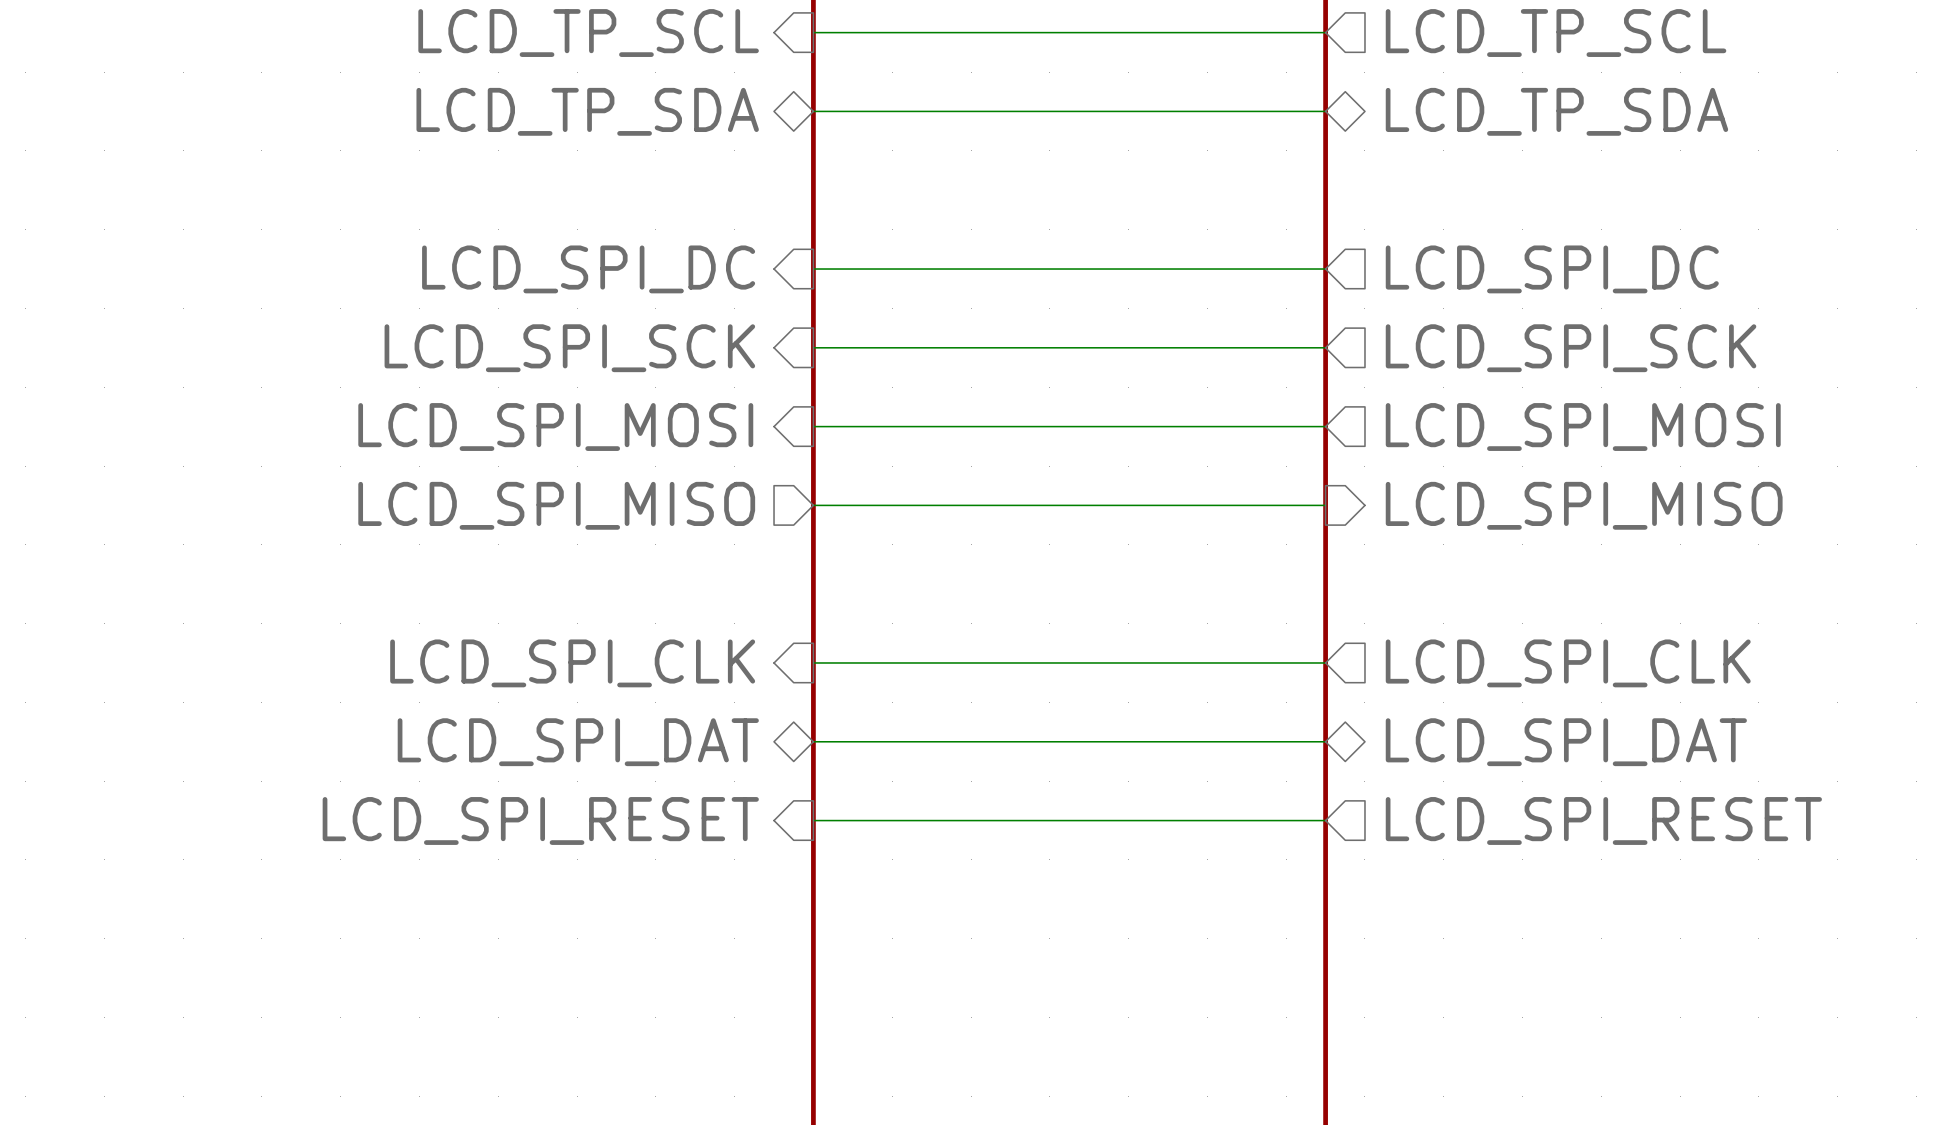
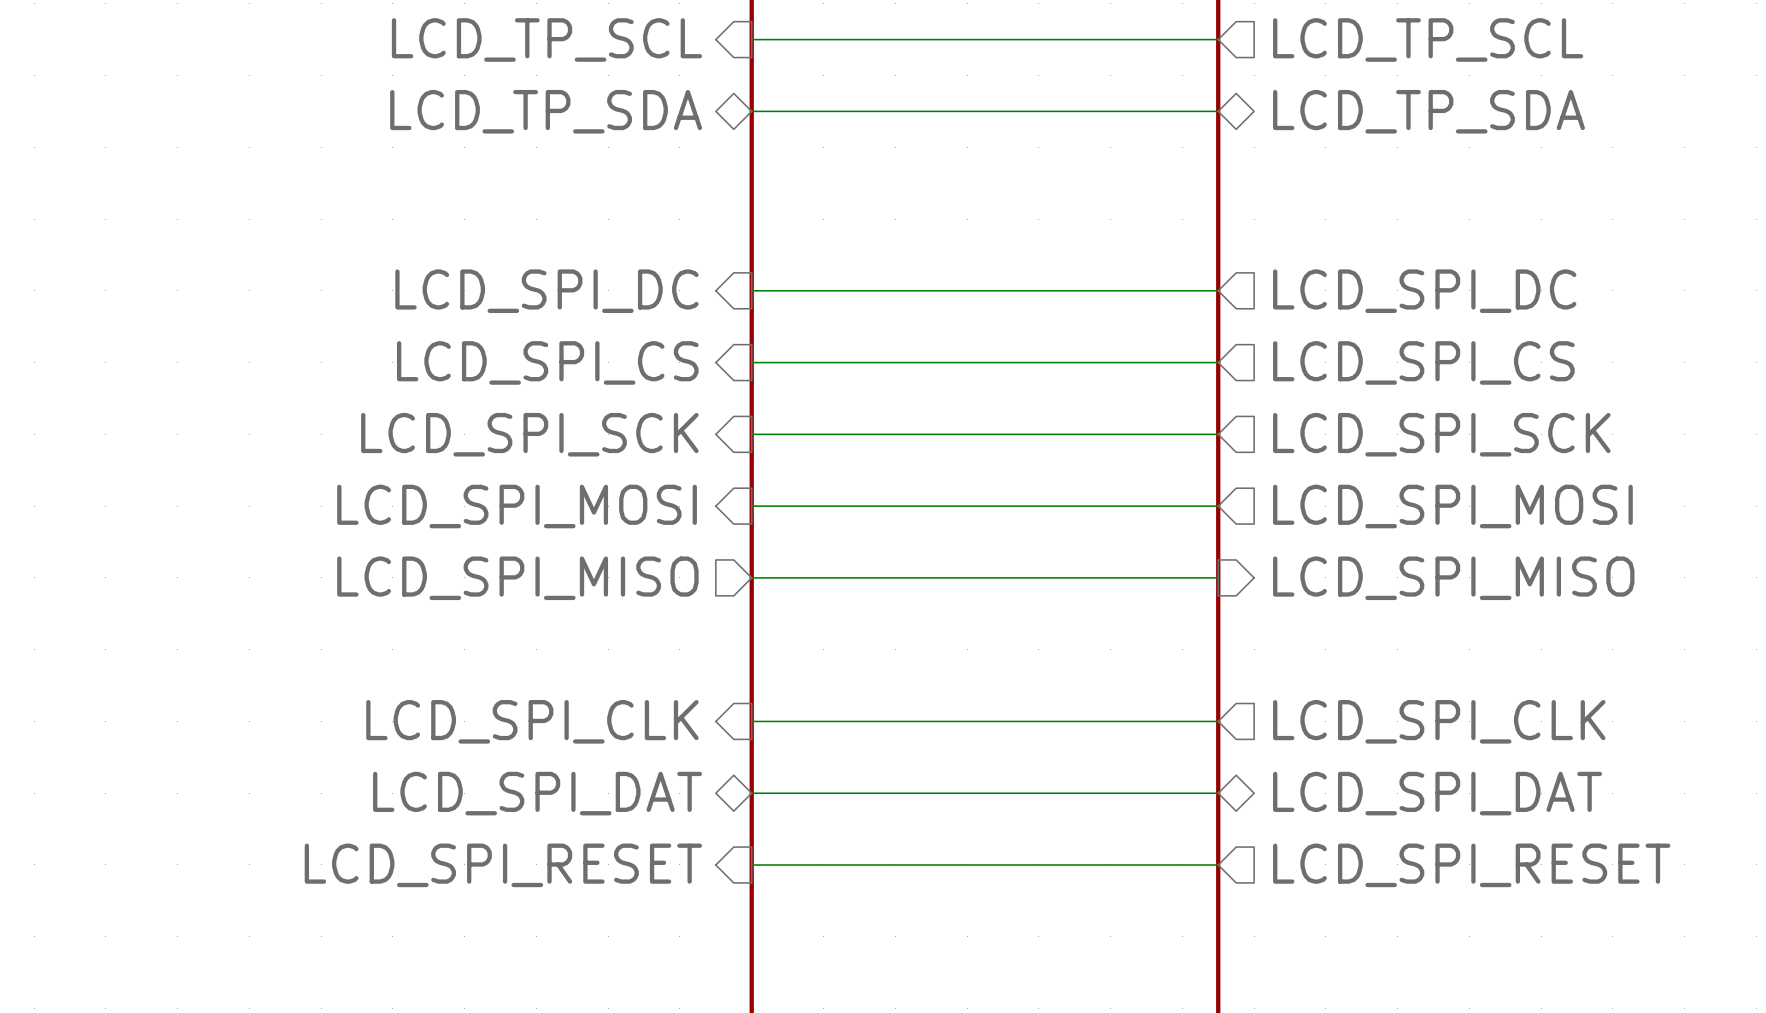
sheet pin position: LCD_SPI_DC (588, 269) -> LCD_SPI_DC (546, 291)
wire: (813, 269) (1325, 269) -> (751, 362) (1218, 362)
sheet pin position: LCD_SPI_DC (1552, 269) -> LCD_SPI_DC (1424, 291)
wire: none -> (751, 290) (1218, 290)
wire: (813, 347) (1325, 347) -> (751, 434) (1218, 434)
sheet pin position: LCD_SPI_SCK (569, 348) -> LCD_SPI_SCK (529, 434)
sheet pin position: LCD_SPI_SCK (1571, 348) -> LCD_SPI_SCK (1441, 434)
sheet pin: none -> LCD_SPI_CS (547, 362)
sheet pin: none -> LCD_SPI_CS (1423, 362)
wire: (813, 426) (1325, 426) -> (751, 506) (1218, 506)
sheet pin position: LCD_SPI_MOSI (555, 427) -> LCD_SPI_MOSI (517, 506)
sheet pin position: LCD_SPI_MOSI (1583, 427) -> LCD_SPI_MOSI (1452, 506)
sheet pin position: LCD_SPI_MISO (556, 505) -> LCD_SPI_MISO (517, 578)
wire: (813, 505) (1325, 505) -> (751, 577) (1218, 577)
sheet pin position: LCD_SPI_MISO (1584, 505) -> LCD_SPI_MISO (1453, 578)
wire: (813, 662) (1325, 662) -> (751, 721) (1218, 721)
sheet pin position: LCD_SPI_CLK (572, 663) -> LCD_SPI_CLK (532, 721)
sheet pin position: LCD_SPI_CLK (1568, 663) -> LCD_SPI_CLK (1439, 721)
wire: (813, 741) (1325, 741) -> (751, 793) (1218, 793)
sheet pin position: LCD_SPI_DAT (578, 742) -> LCD_SPI_DAT (537, 793)
sheet pin position: LCD_SPI_DAT (1566, 742) -> LCD_SPI_DAT (1437, 793)
sheet pin position: LCD_SPI_RESET (540, 820) -> LCD_SPI_RESET (503, 865)
wire: (813, 820) (1325, 820) -> (751, 864) (1218, 864)
sheet pin position: LCD_SPI_RESET (1603, 820) -> LCD_SPI_RESET (1471, 865)

